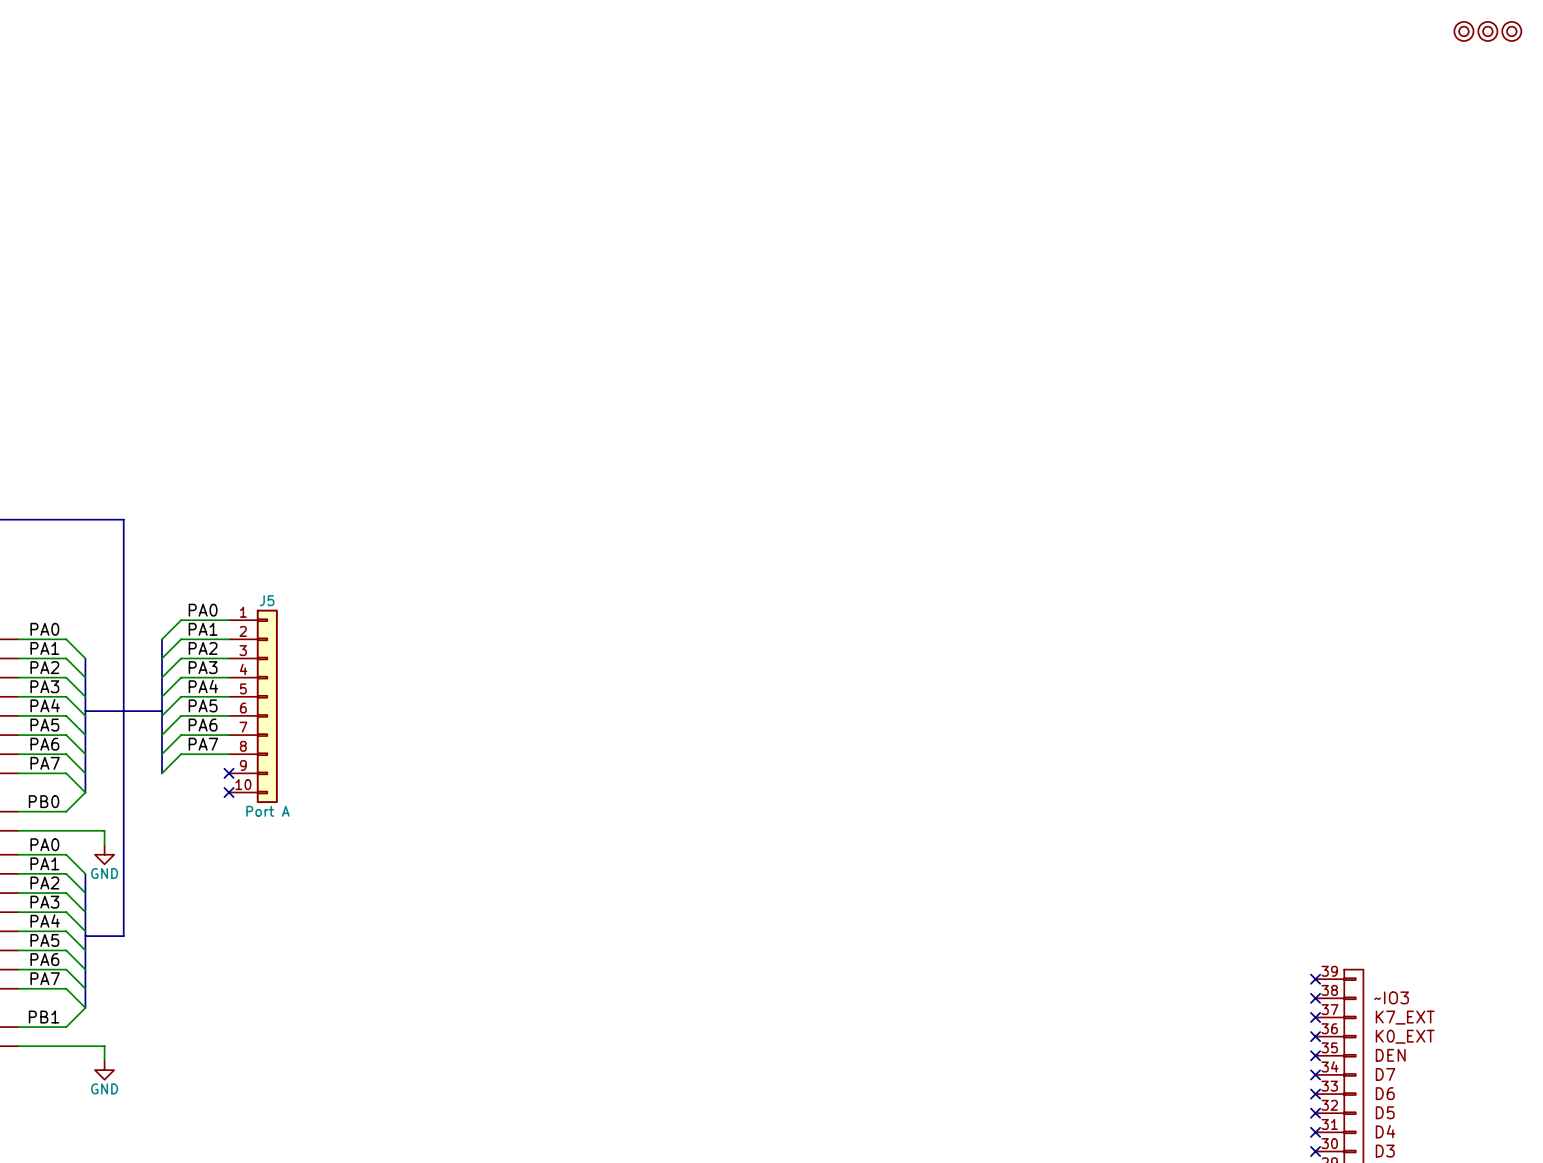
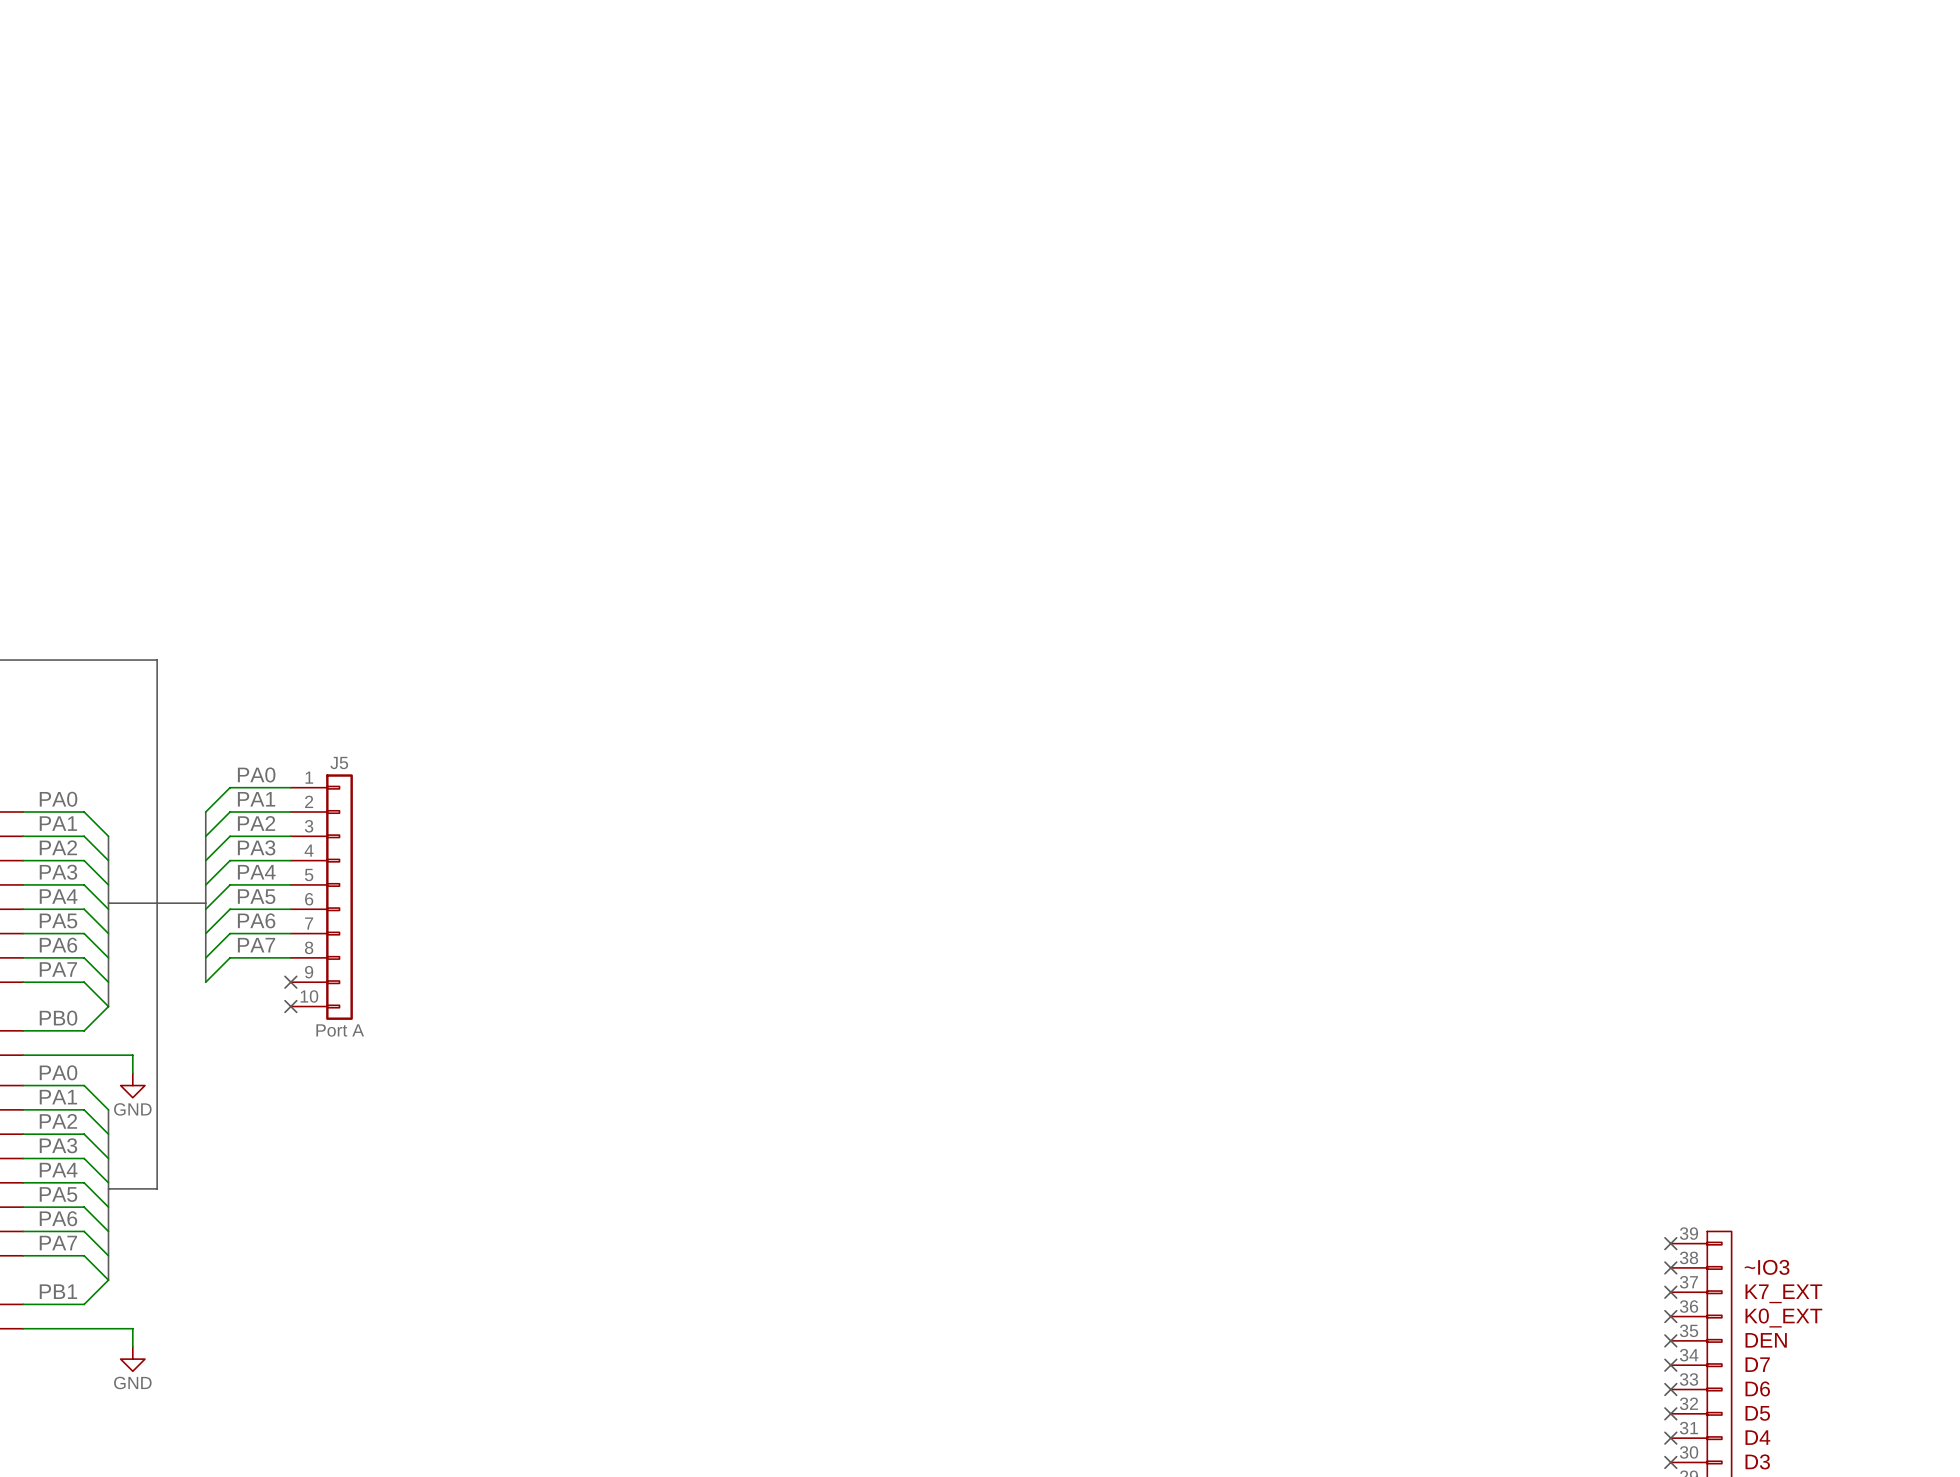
part: (1463, 31) -> none
part: (1487, 31) -> none
part: (1511, 31) -> none

